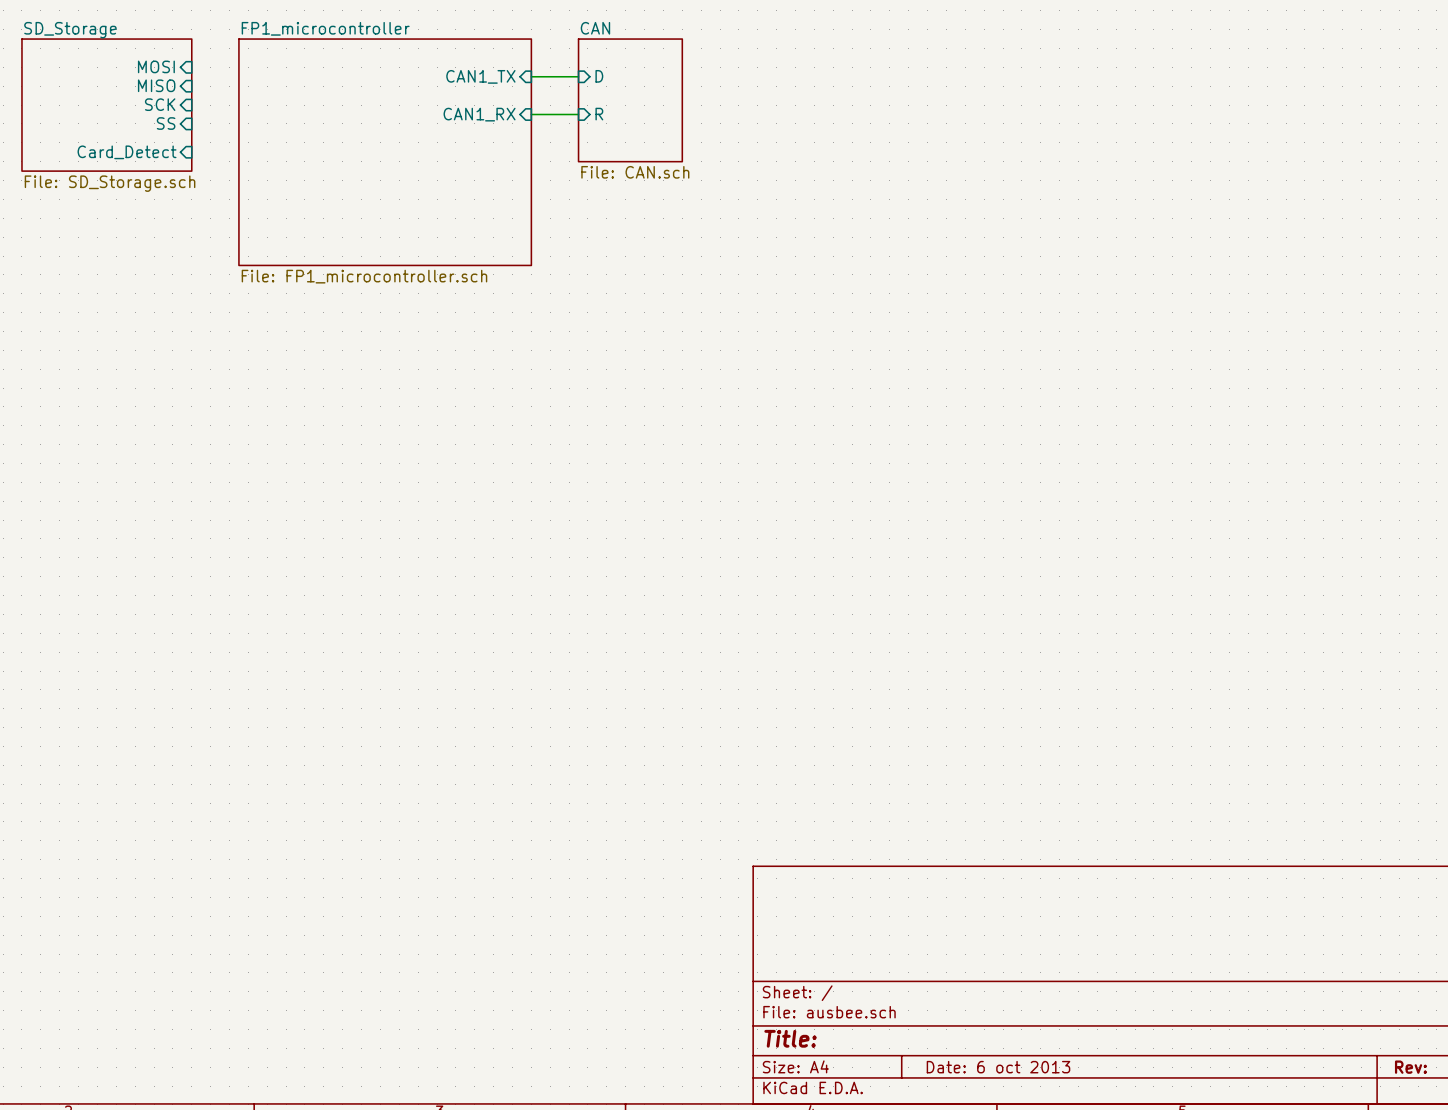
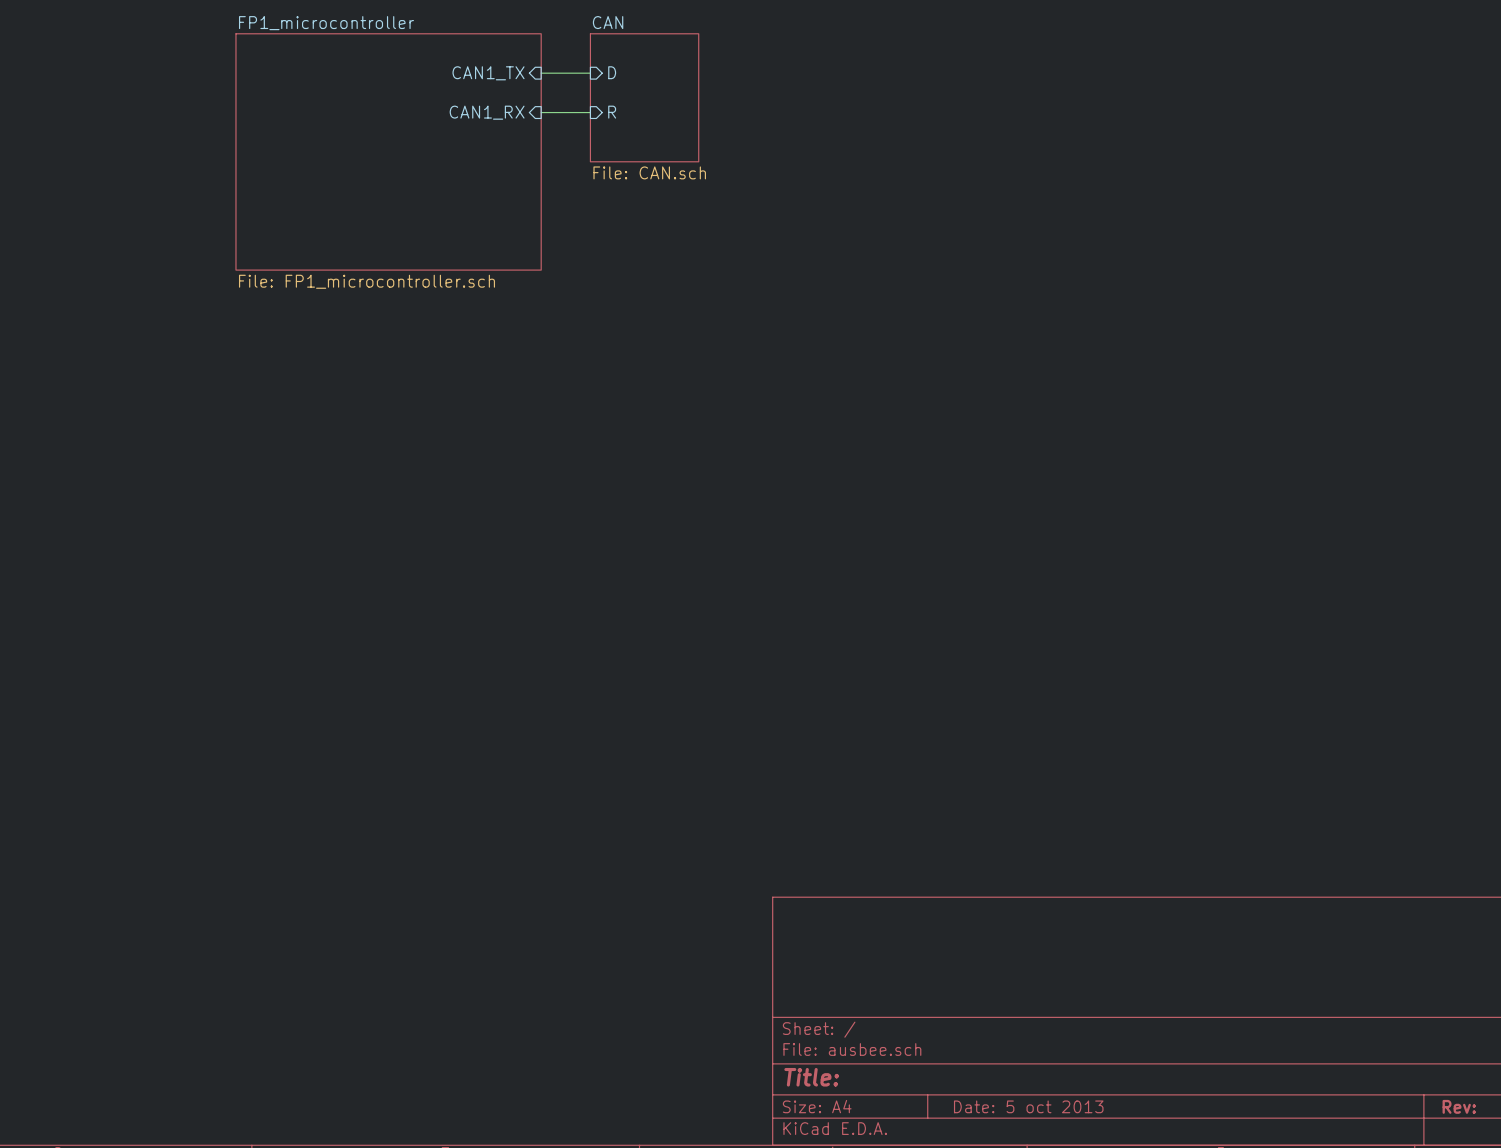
sheet pin: MOSI (156, 66) -> none
sheet pin: MISO (156, 85) -> none
sheet pin: SCK (160, 104) -> none
sheet SD_Storage: File: SD_Storage.sch (106, 105) -> none
sheet pin: SS (166, 123) -> none
sheet pin: Card_Detect (127, 152) -> none
title block: Date: 6 oct 2013 (998, 1067) -> Date: 5 oct 2013 (1028, 1106)

